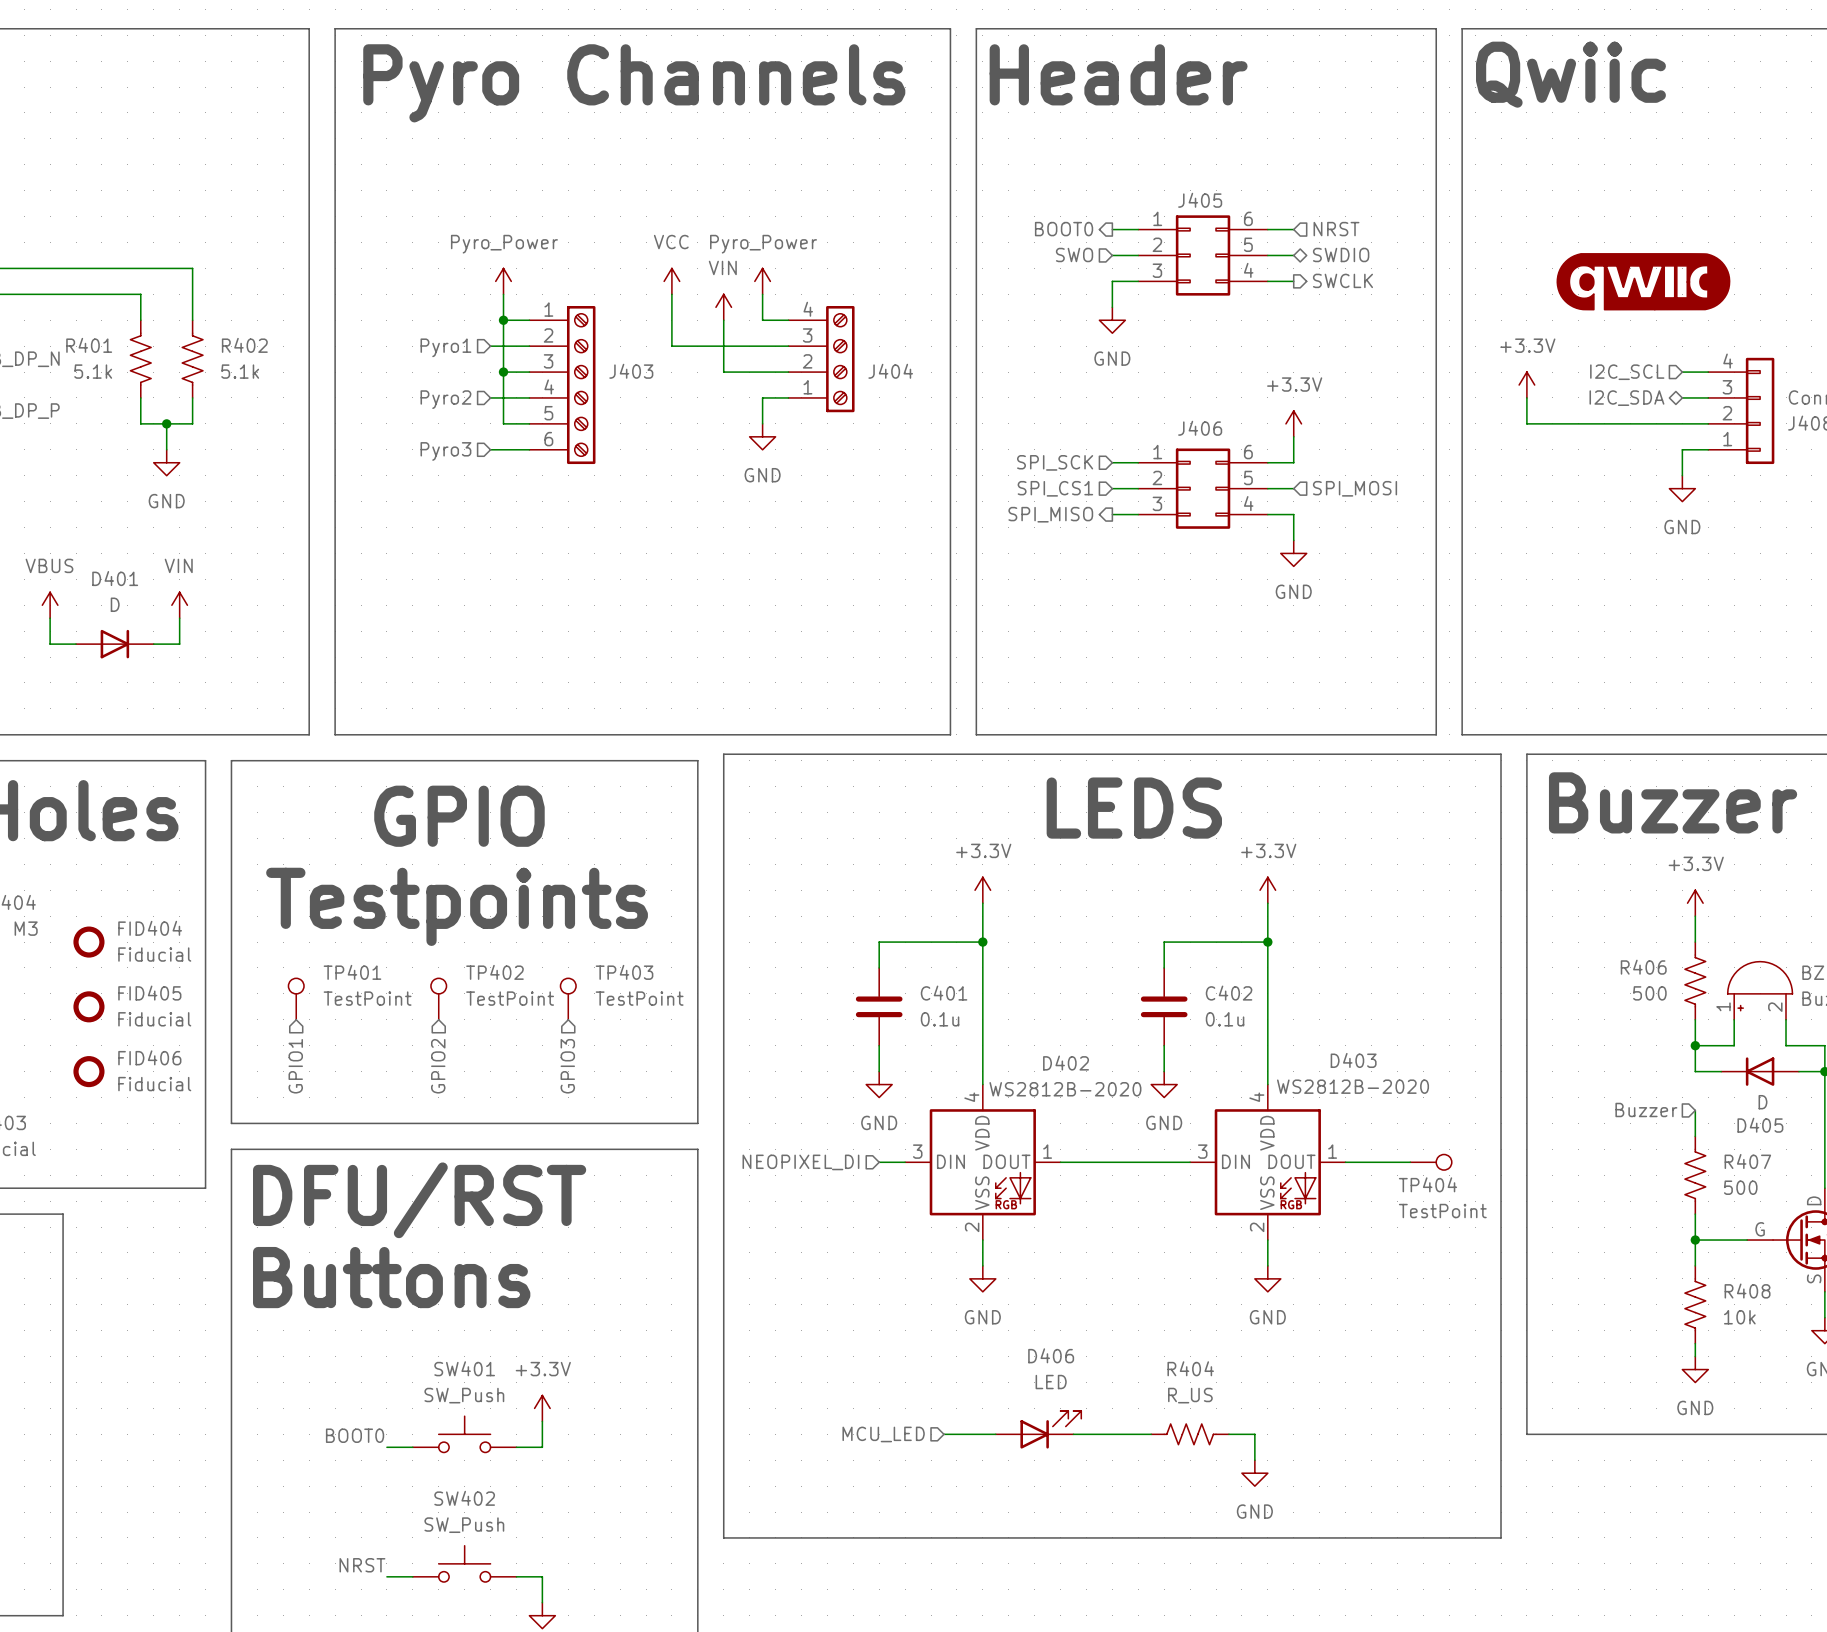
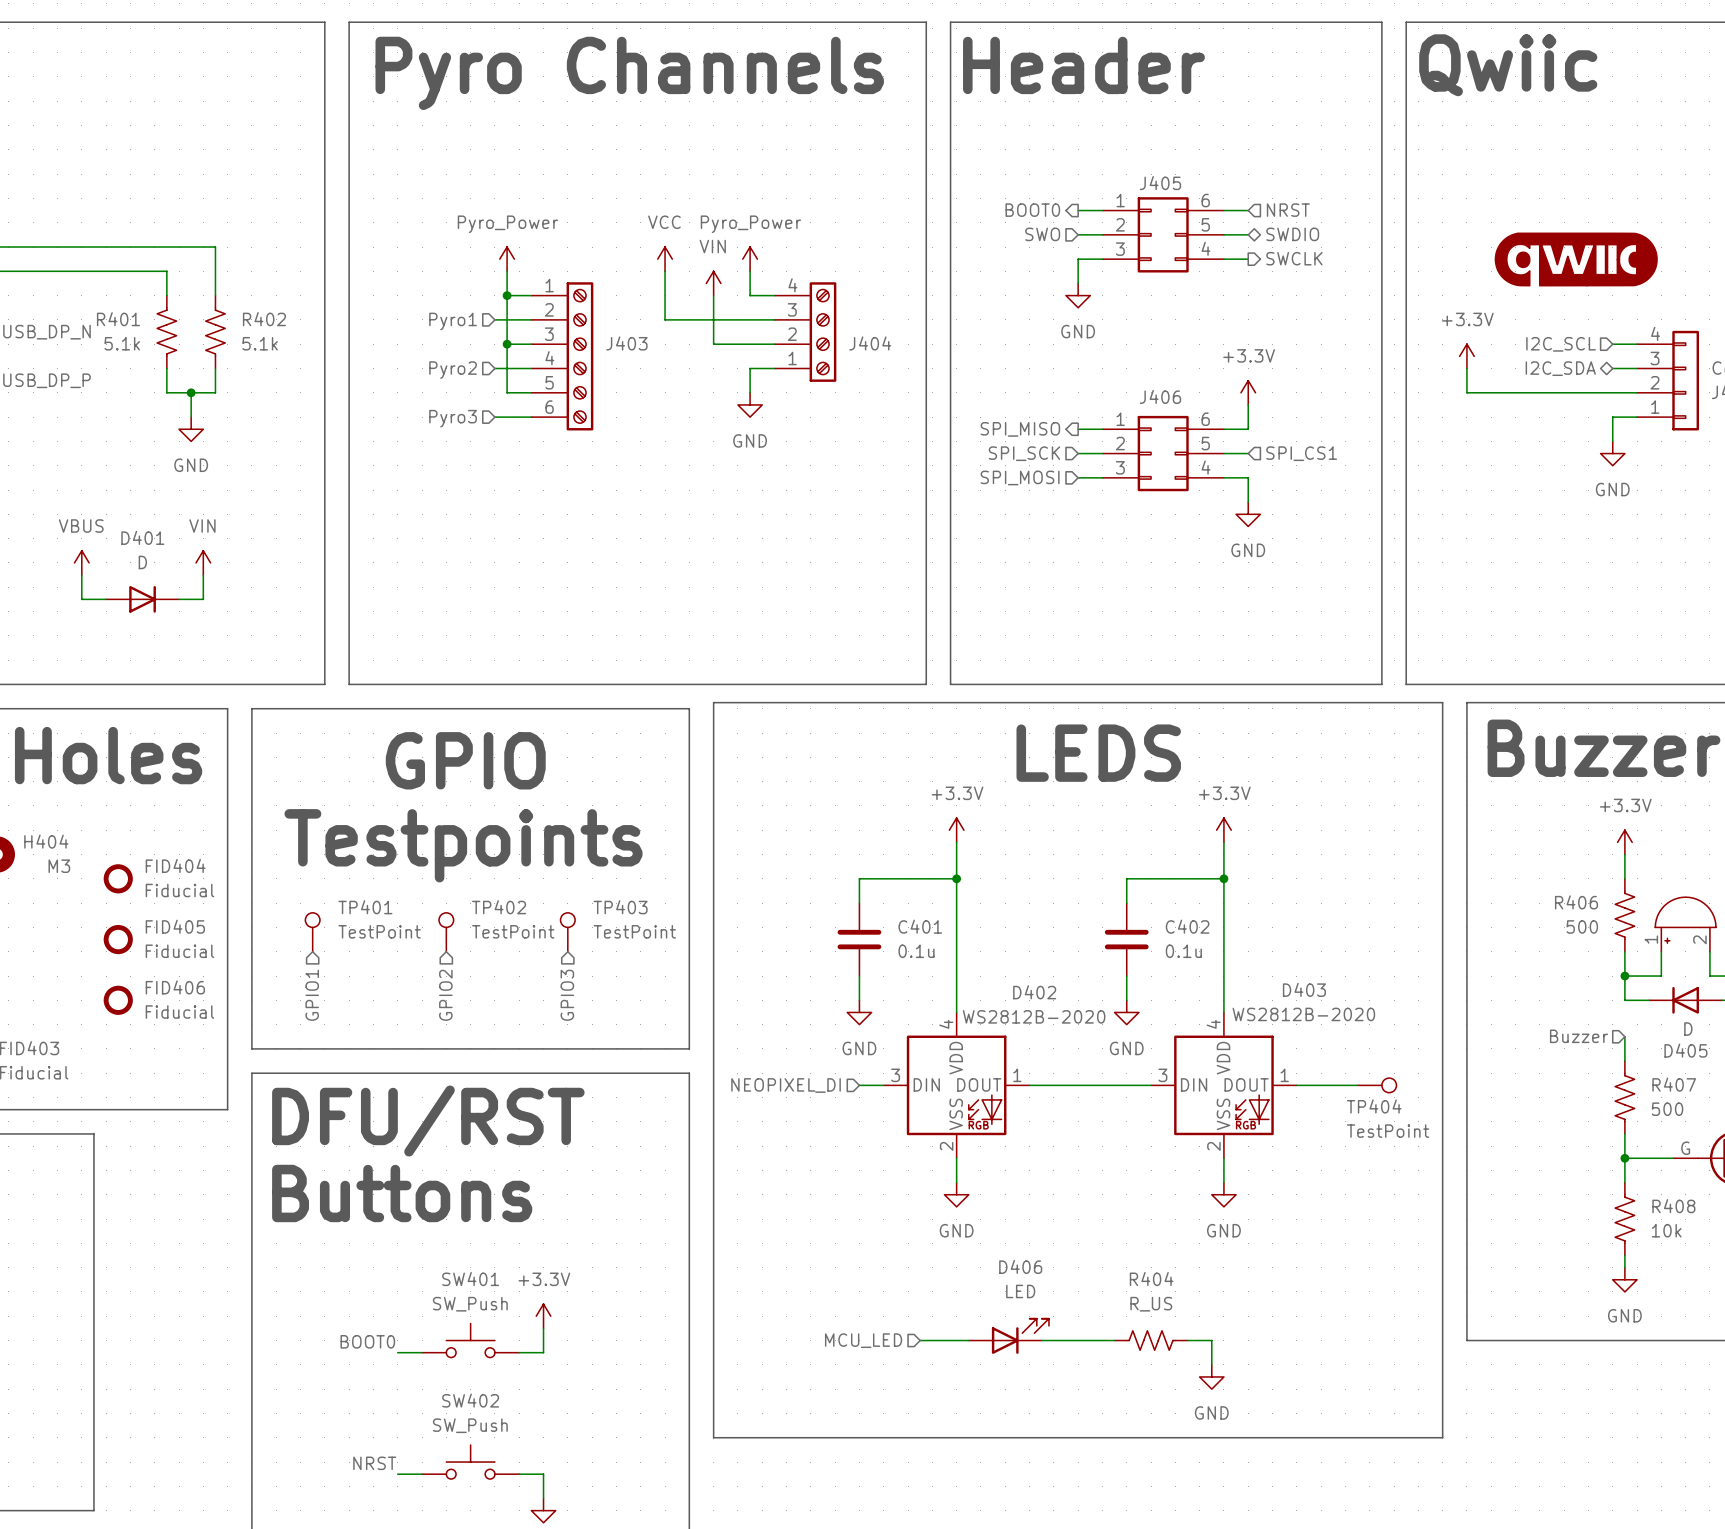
hierarchical label shape: input (1055, 462) -> output (1020, 429)
hierarchical label: SPI_SCK (1055, 462) -> SPI_MISO (1020, 429)
hierarchical label: SPI_CS1 (1055, 488) -> SPI_SCK (1024, 453)
hierarchical label: SPI_MOSI (1355, 488) -> SPI_CS1 (1301, 453)
hierarchical label shape: output (1050, 514) -> input (1020, 477)
hierarchical label: SPI_MISO (1050, 514) -> SPI_MOSI (1020, 477)

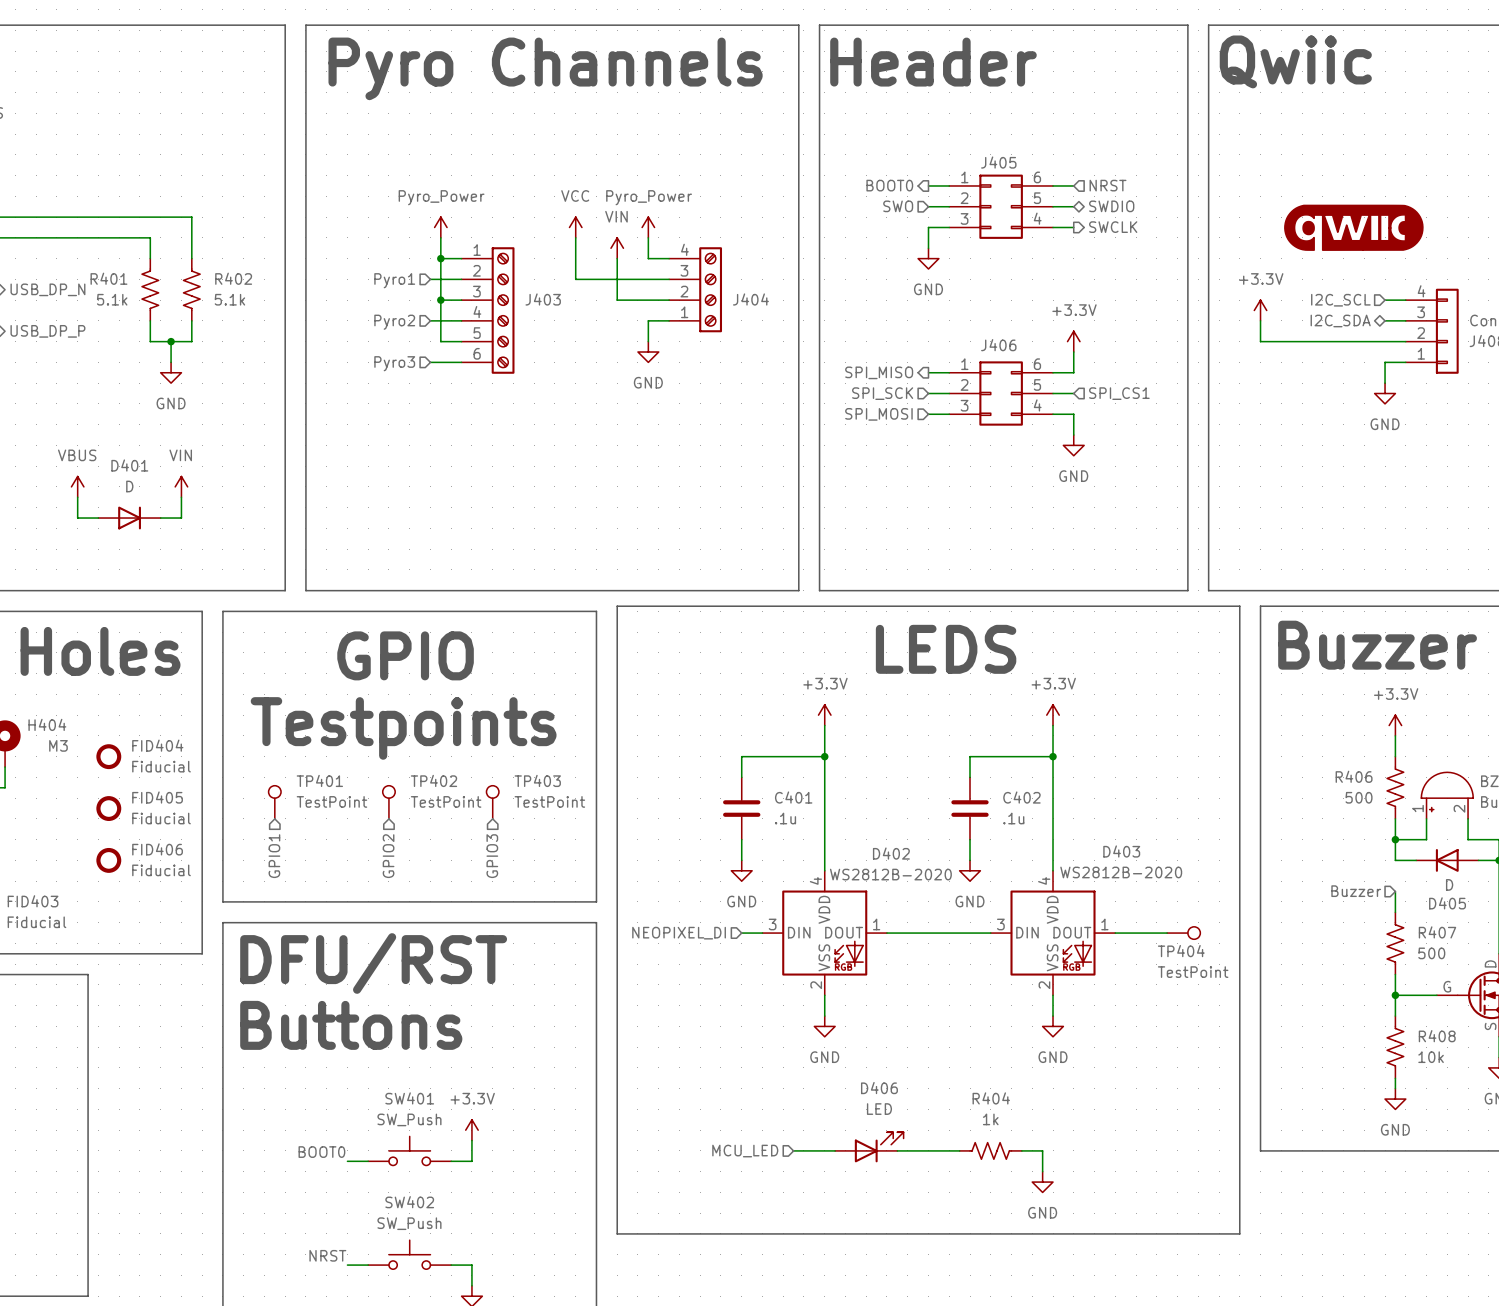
C401 value: 0.1u (916, 951) -> .1u (785, 818)
C402 value: 0.1u (1183, 951) -> .1u (1013, 818)
R404 value: R_US (1151, 1304) -> 1k (990, 1119)

